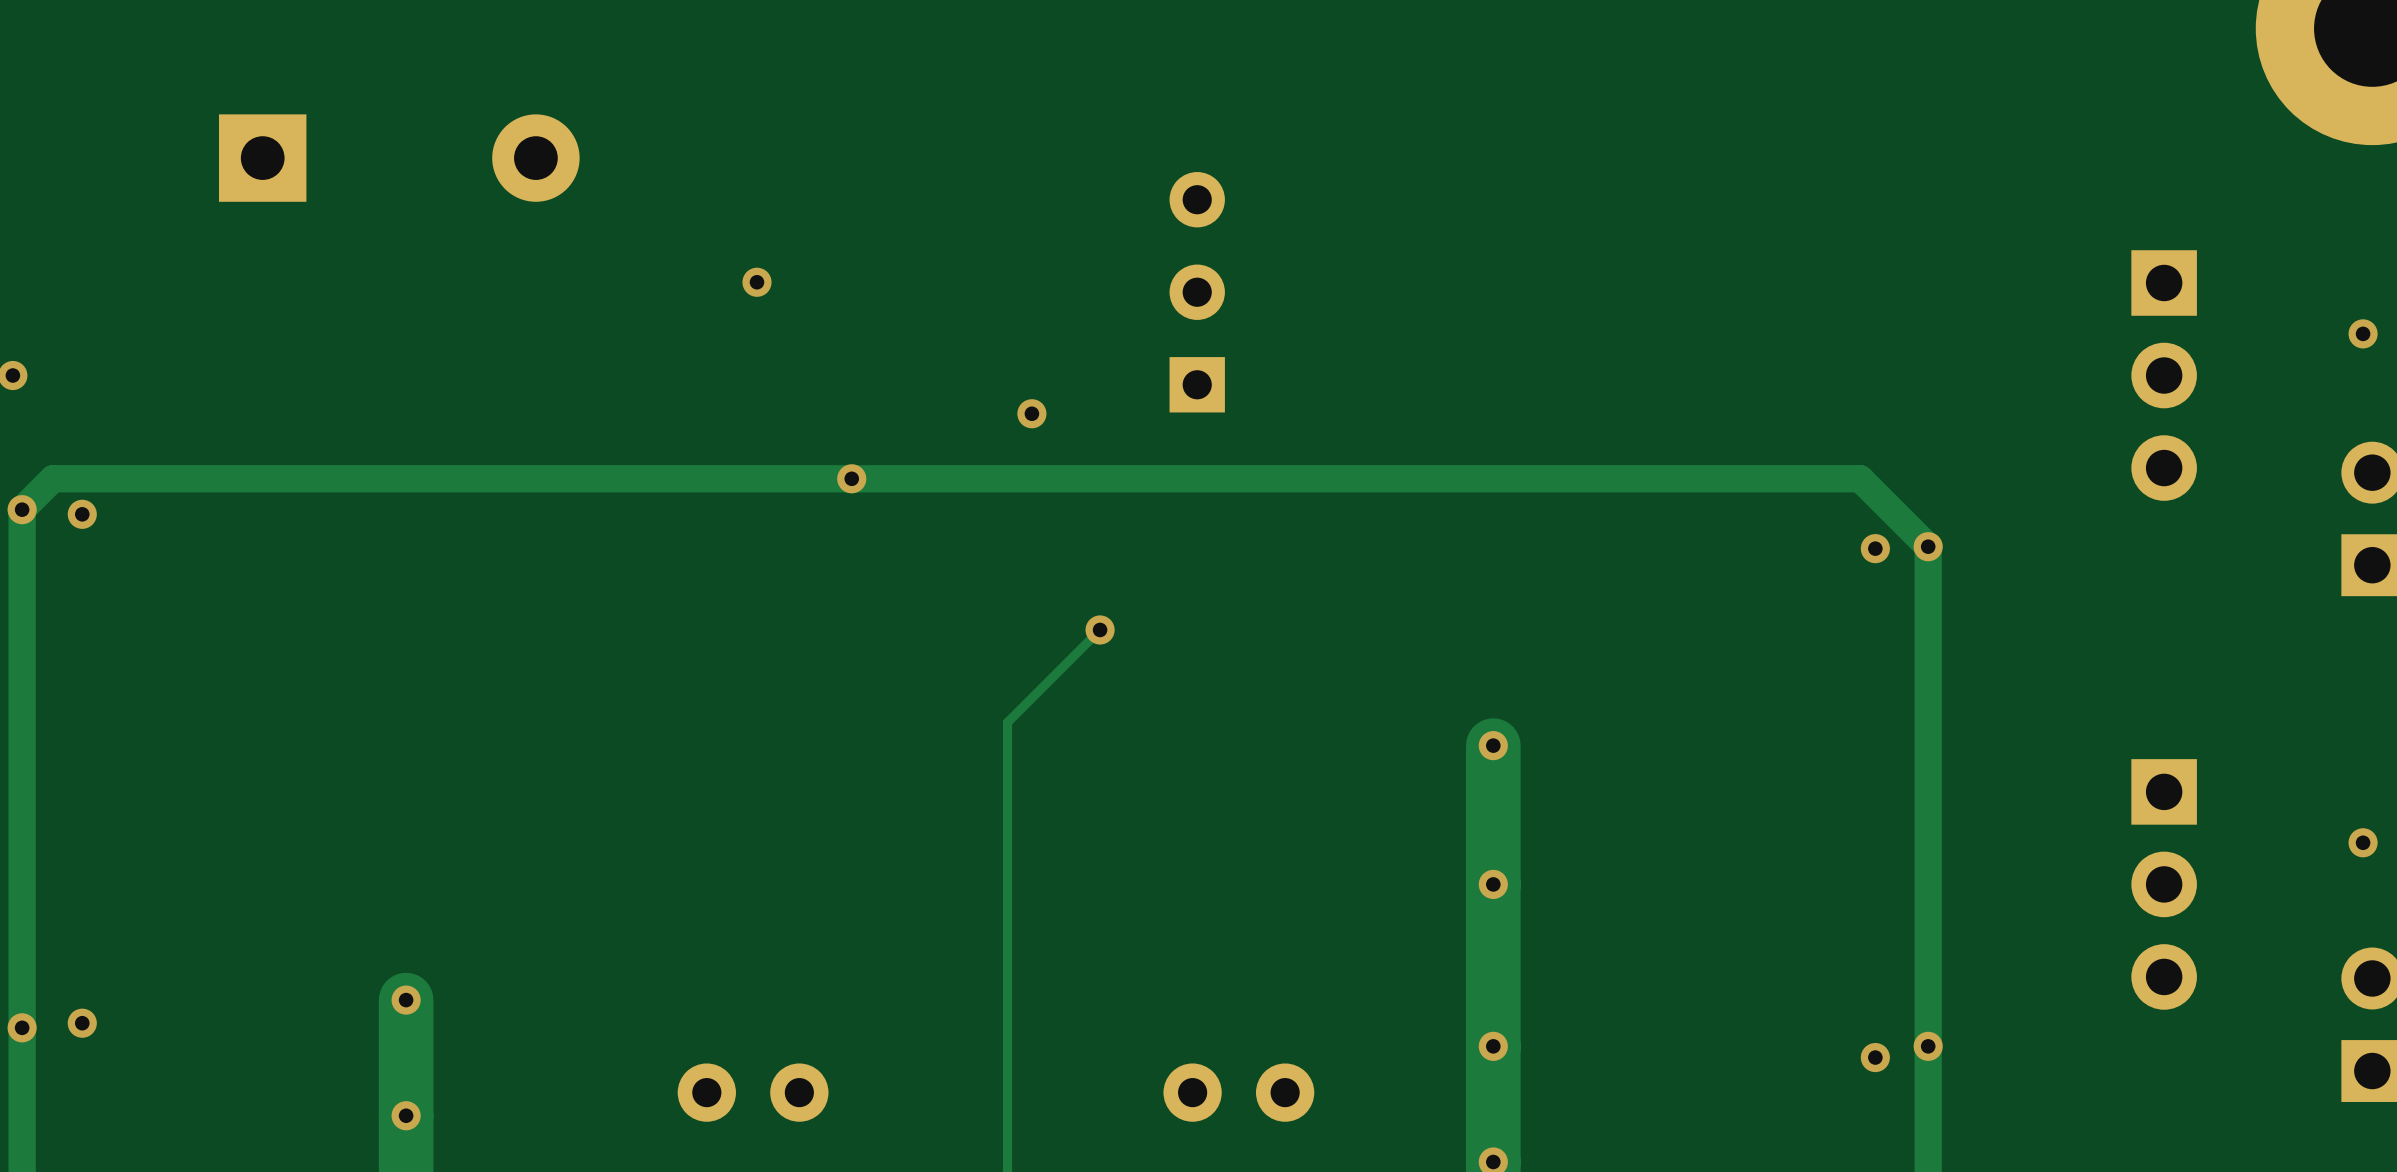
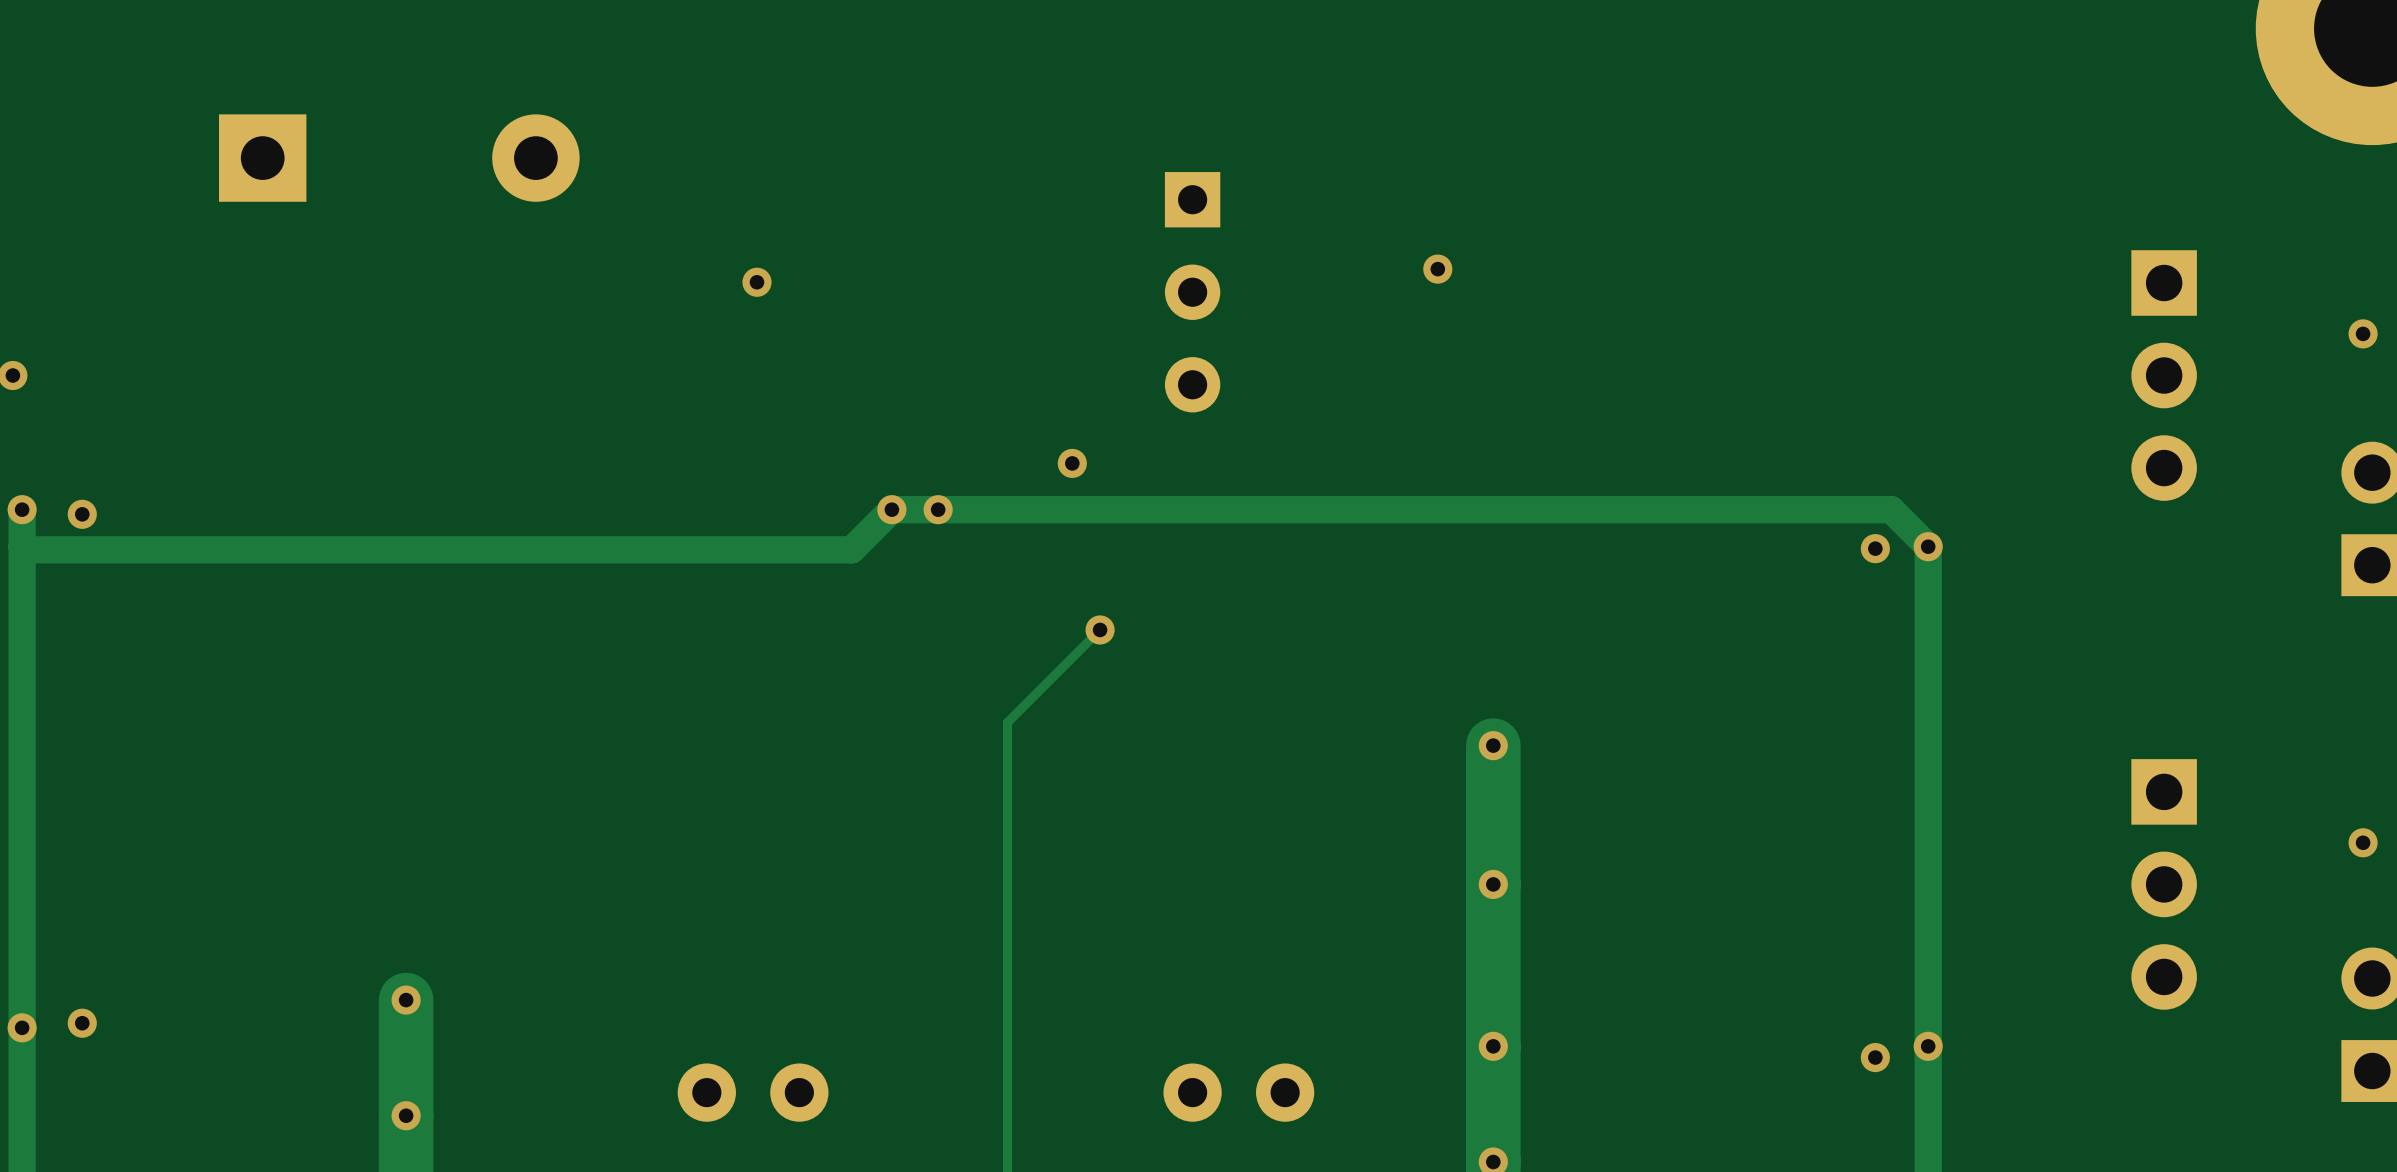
via: none -> (1437, 269)
part rotation: 0° (1197, 292) -> 180° (1192, 292)
via position: (1031, 413) -> (1072, 463)
via: (851, 478) -> none
via: none -> (891, 509)
via: none -> (938, 509)
track: (1891, 509) (1860, 478) (53, 478) (22, 509) -> (1891, 509) (891, 509) (851, 549) (25, 549) (22, 546)

